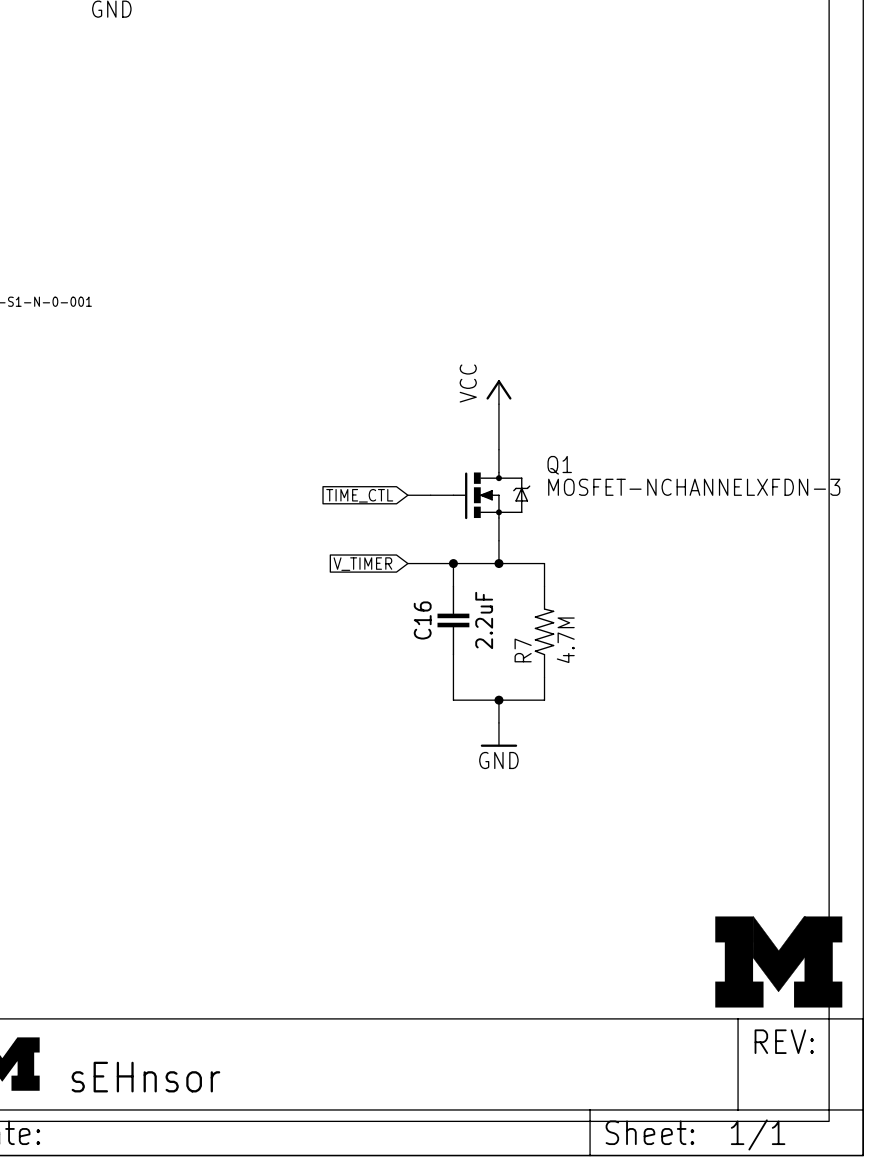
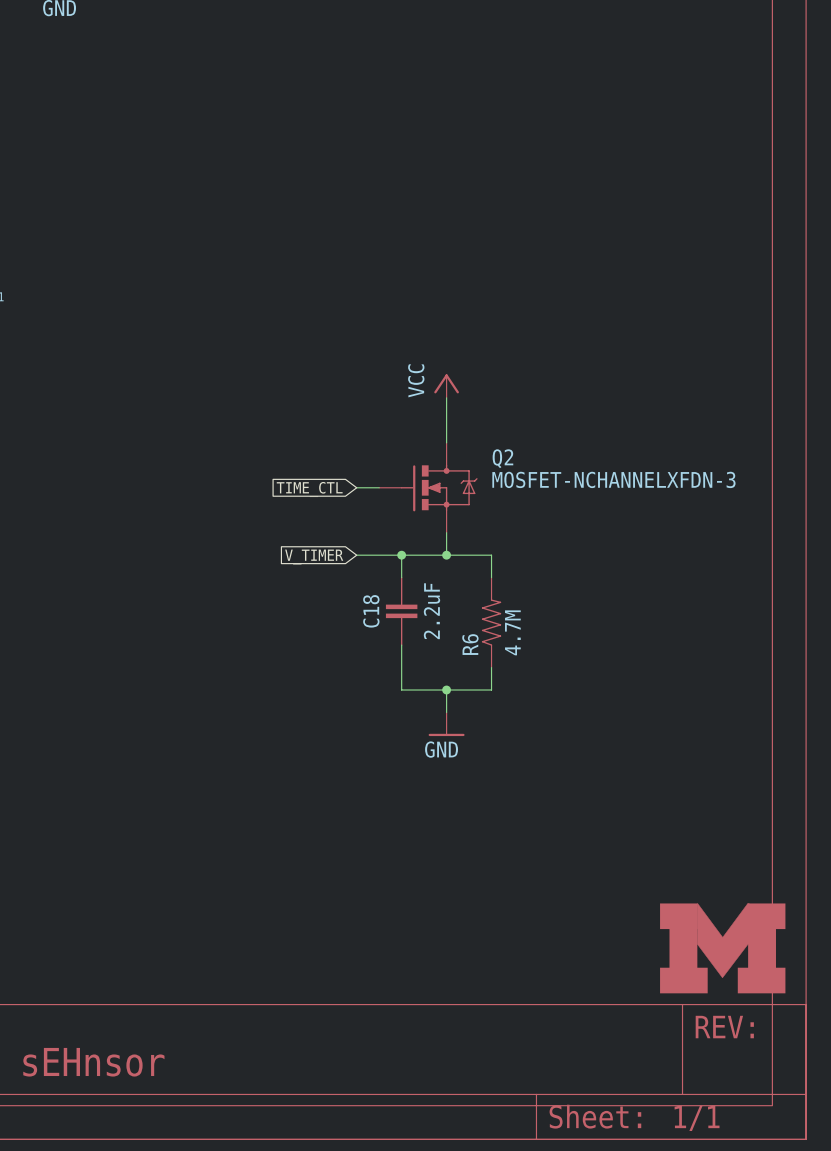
Q1 name: Q1 (559, 465) -> Q2 (502, 458)
C16 name: C16 (422, 620) -> C18 (371, 611)
R7 name: R7 (523, 650) -> R6 (470, 644)

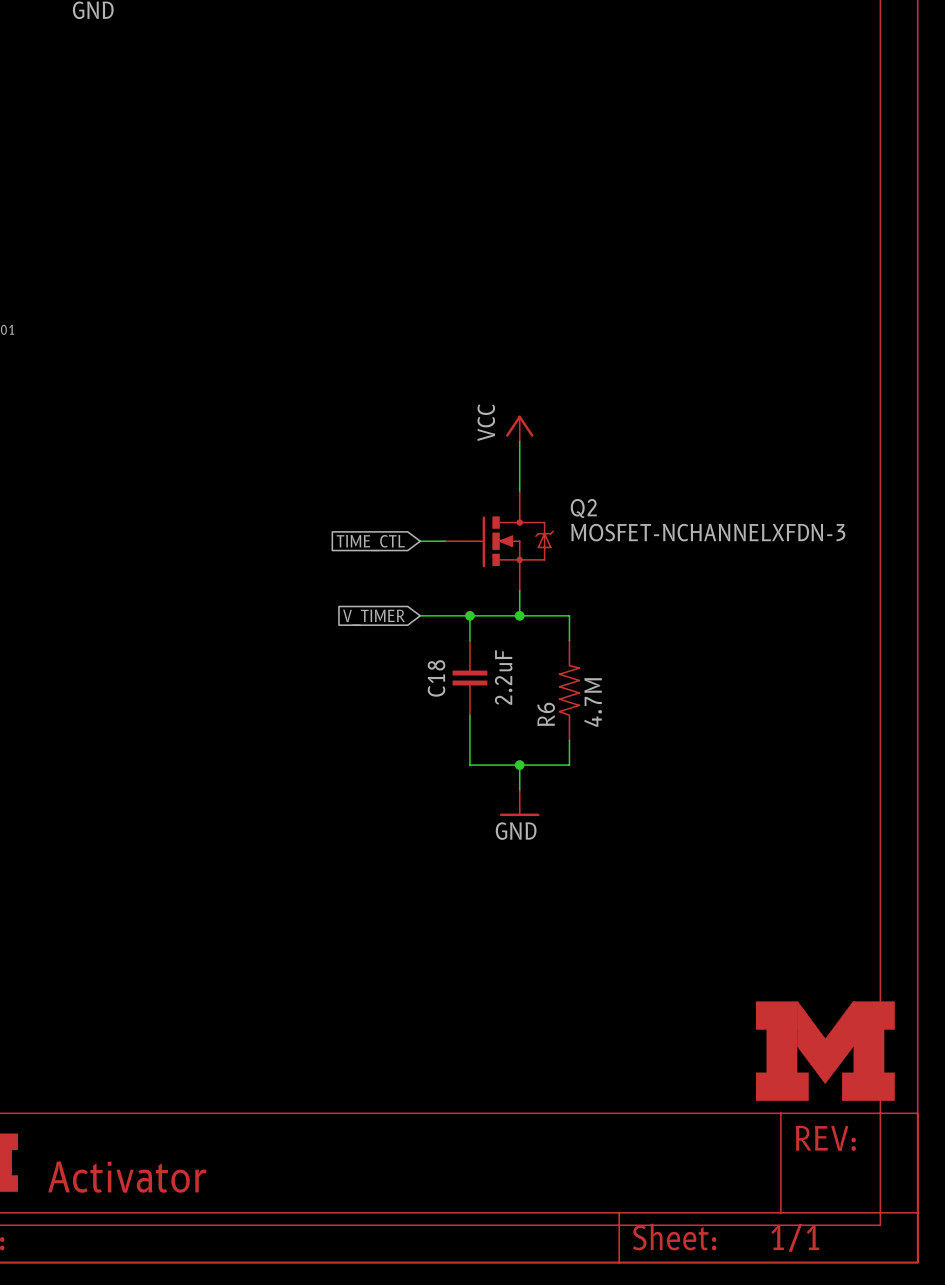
part text: sEHnsor (93, 1062) -> Activator (127, 1177)

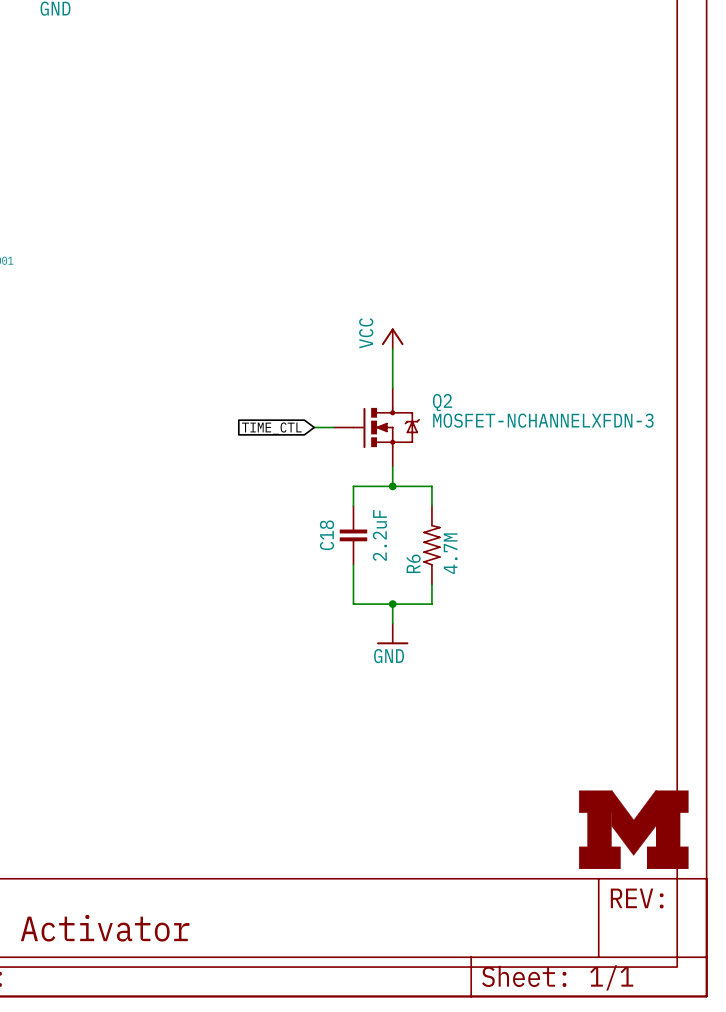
wire: (420, 615) (469, 615) -> none
junction: (469, 615) -> none
global label: V_TIMER (374, 617) -> none

